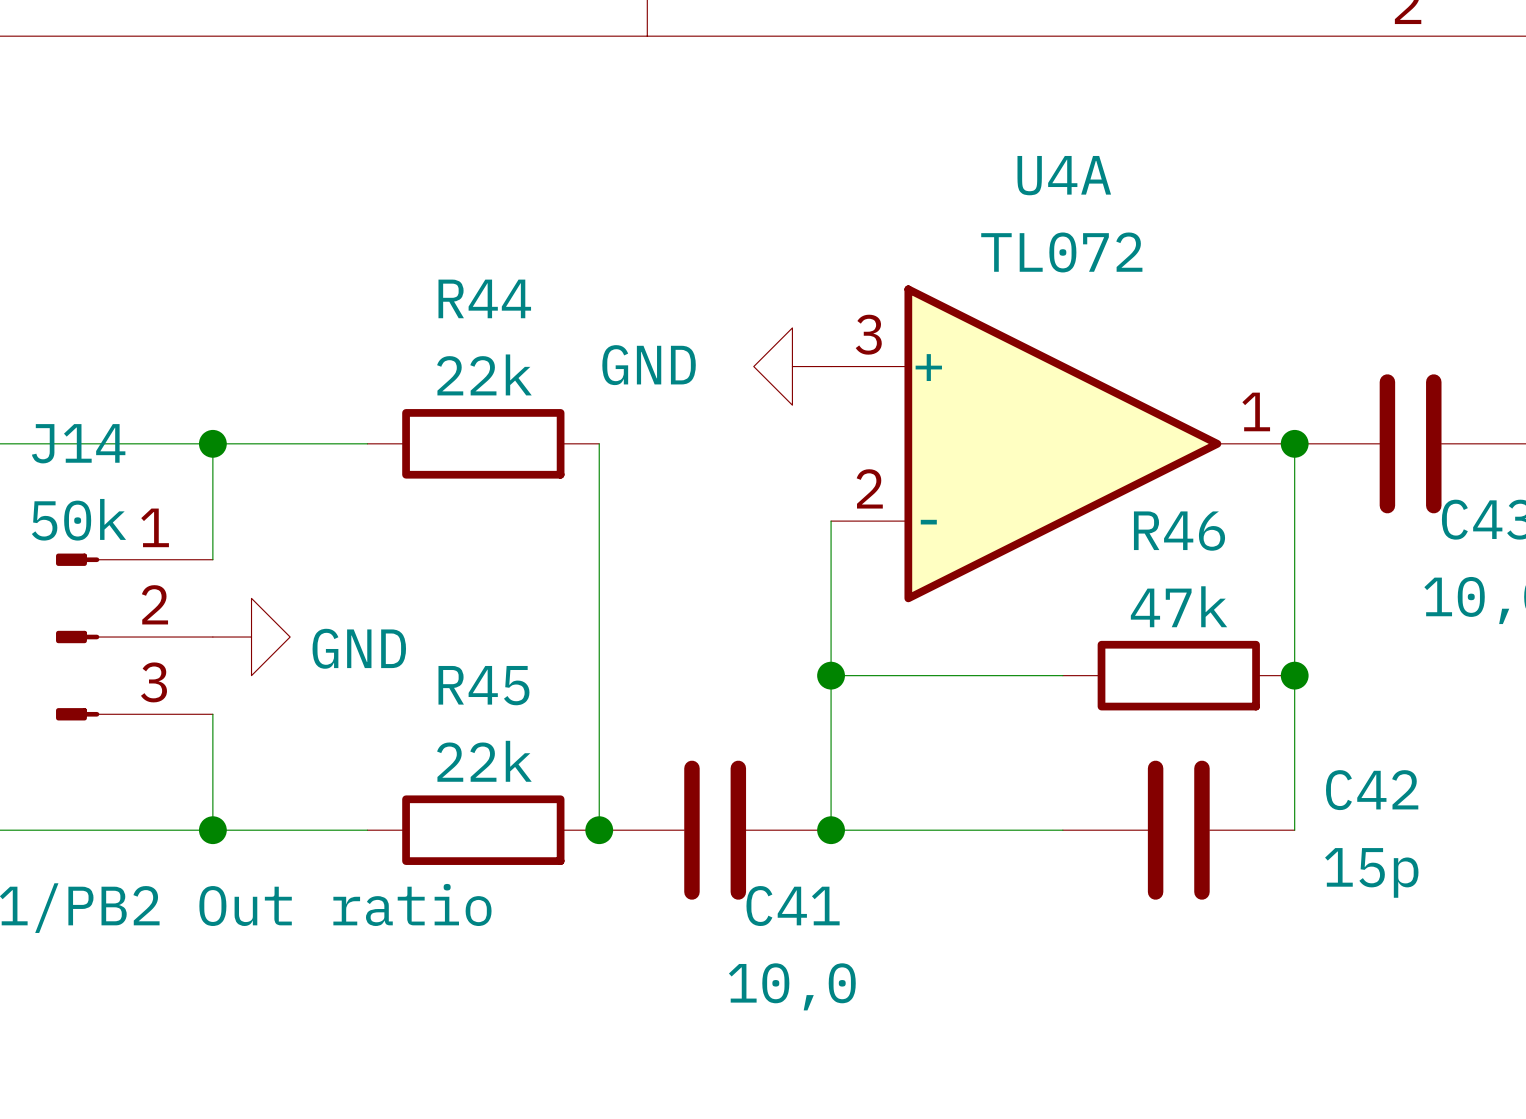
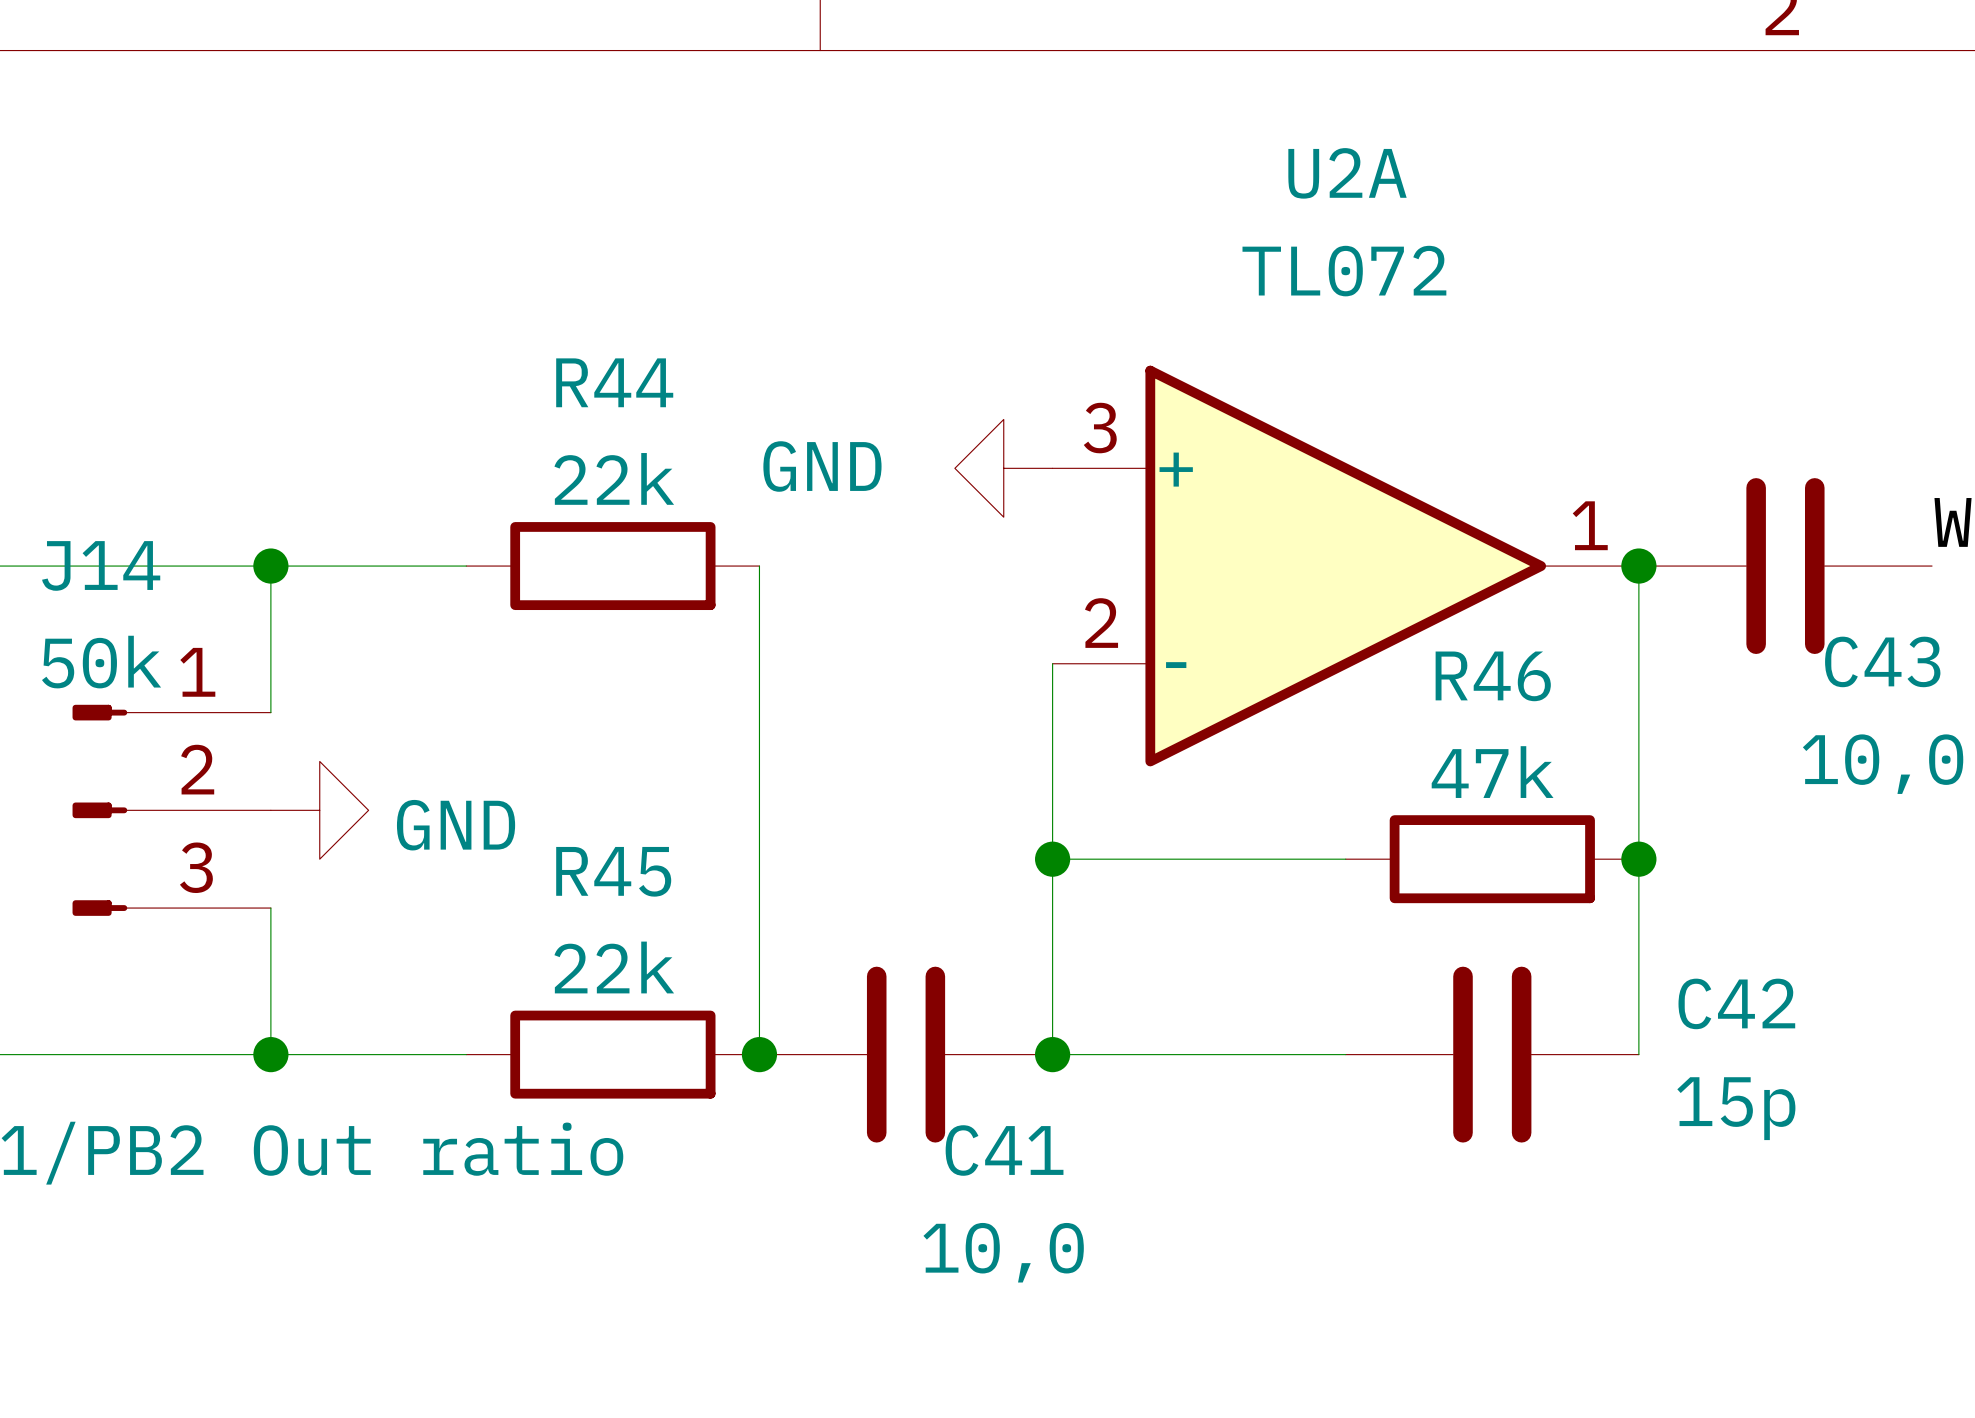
U4A name: U4A (1064, 175) -> U2A (1347, 173)
U4A value position: TL072 (1061, 252) -> TL072 (1344, 271)

